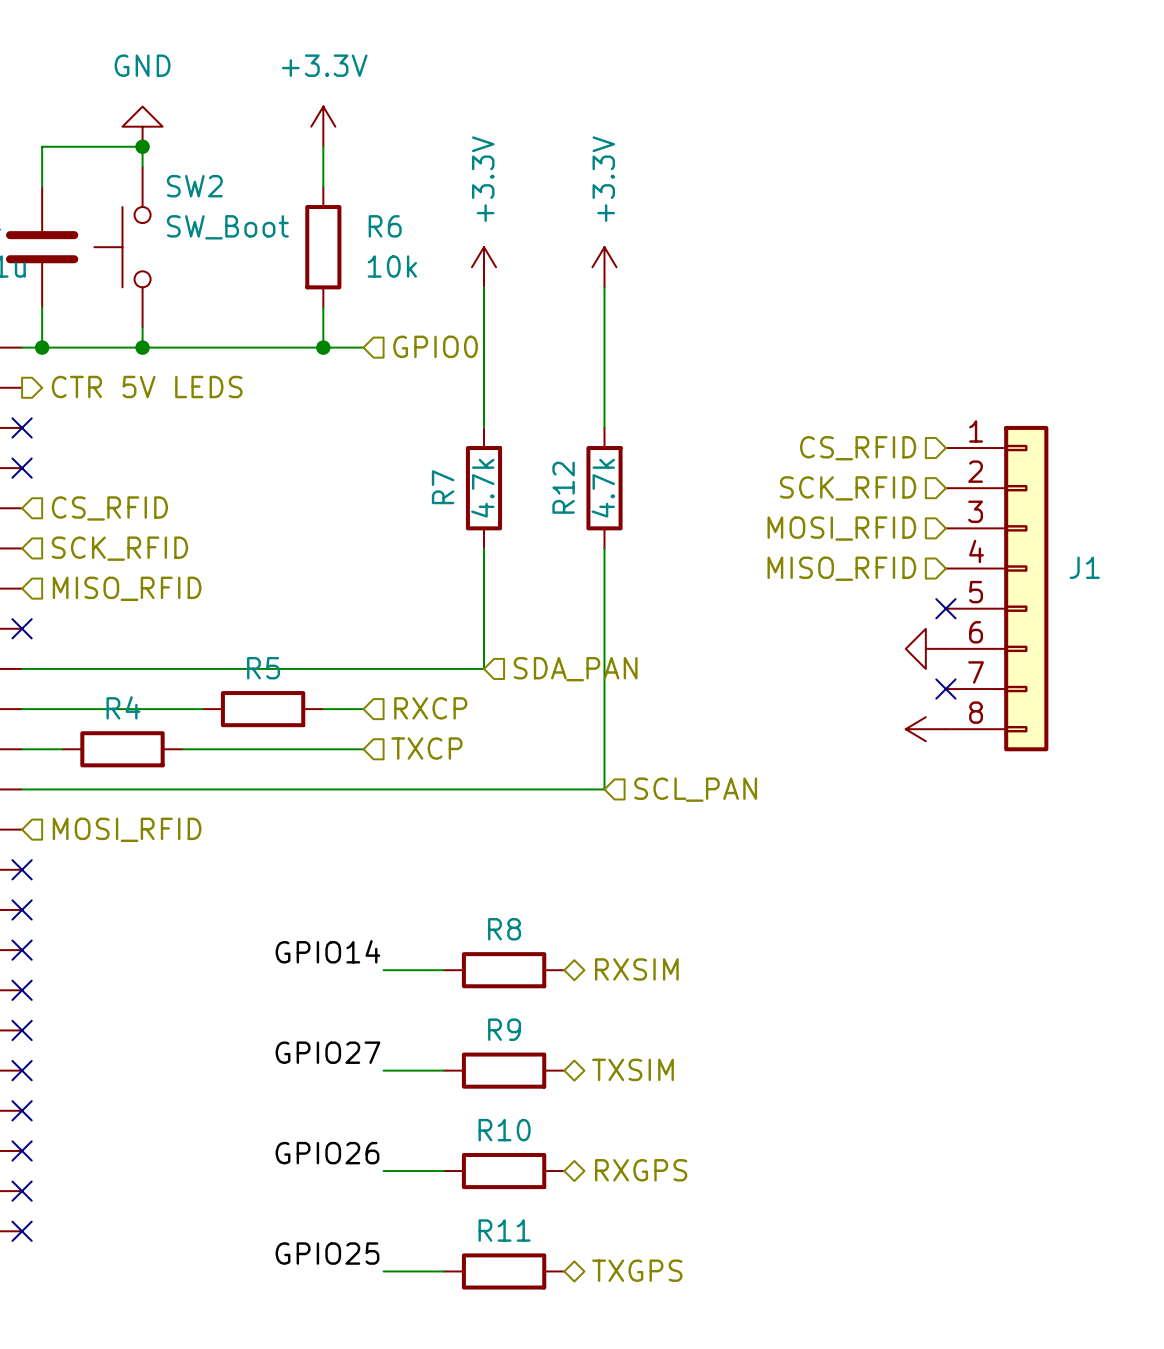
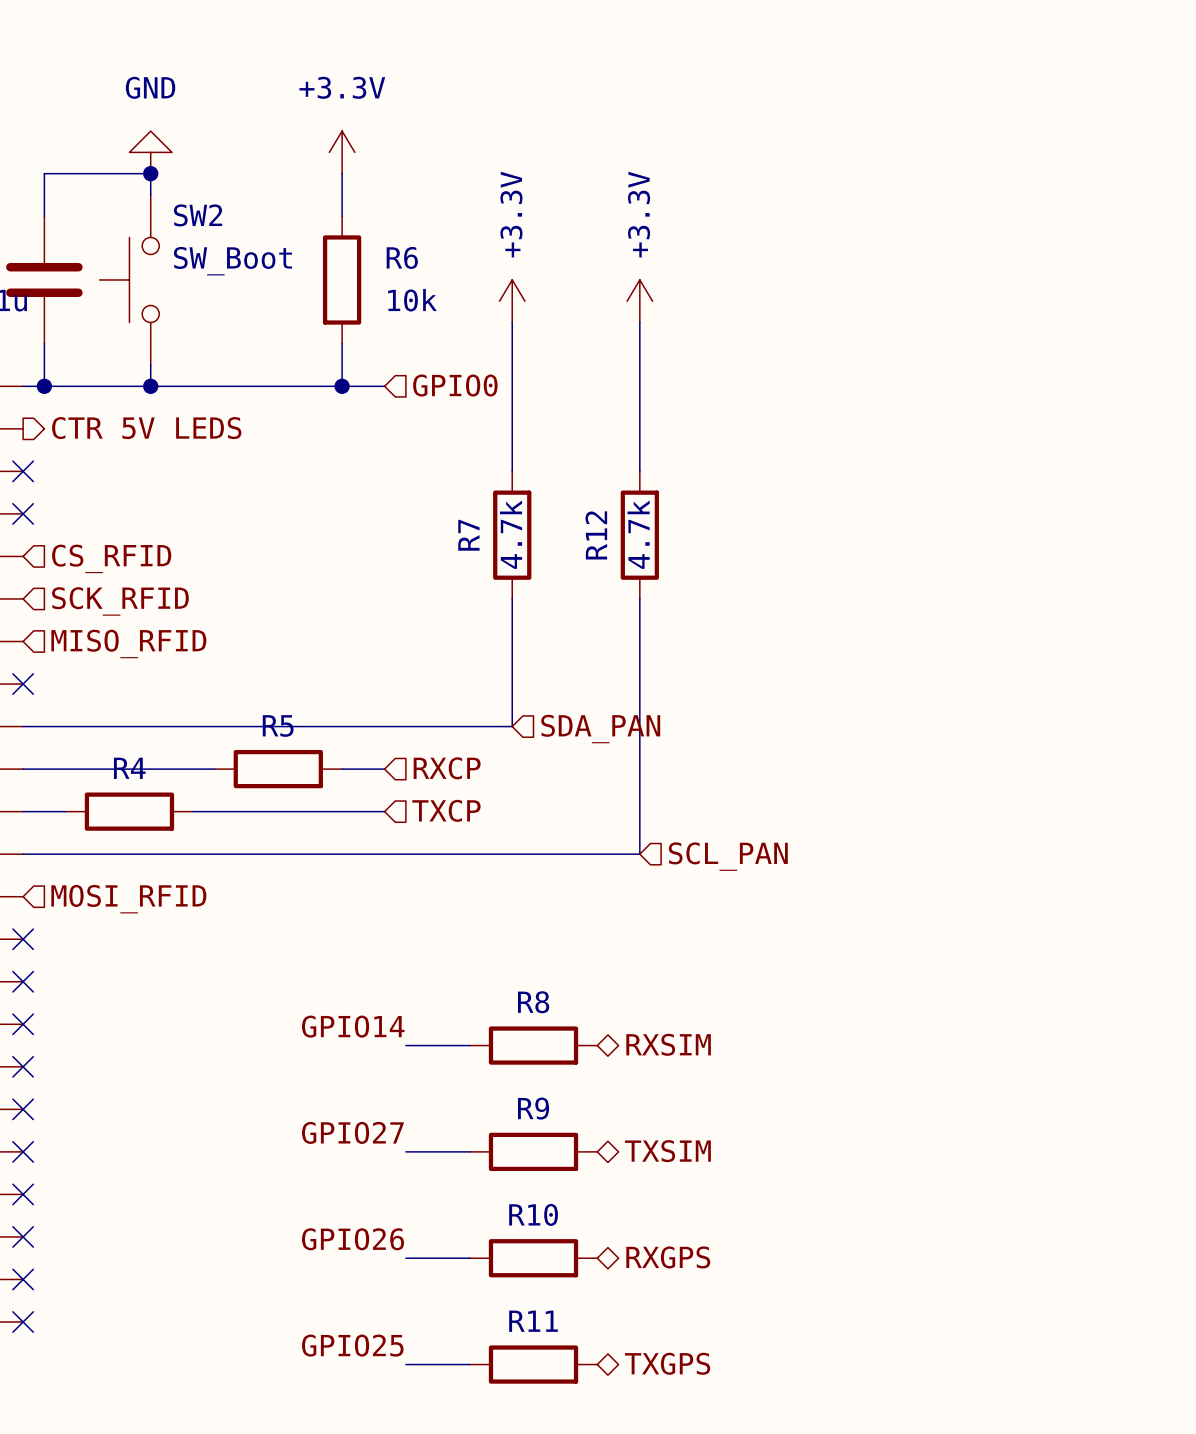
hierarchical label: CS_RFID (858, 448) -> none
hierarchical label: SCK_RFID (848, 488) -> none
hierarchical label: MOSI_RFID (841, 528) -> none
hierarchical label: MISO_RFID (841, 568) -> none
J1: (997, 588) -> none
no-connect mark: (945, 608) -> none
power symbol: (925, 648) -> none
no-connect mark: (945, 689) -> none
power symbol: (925, 729) -> none

